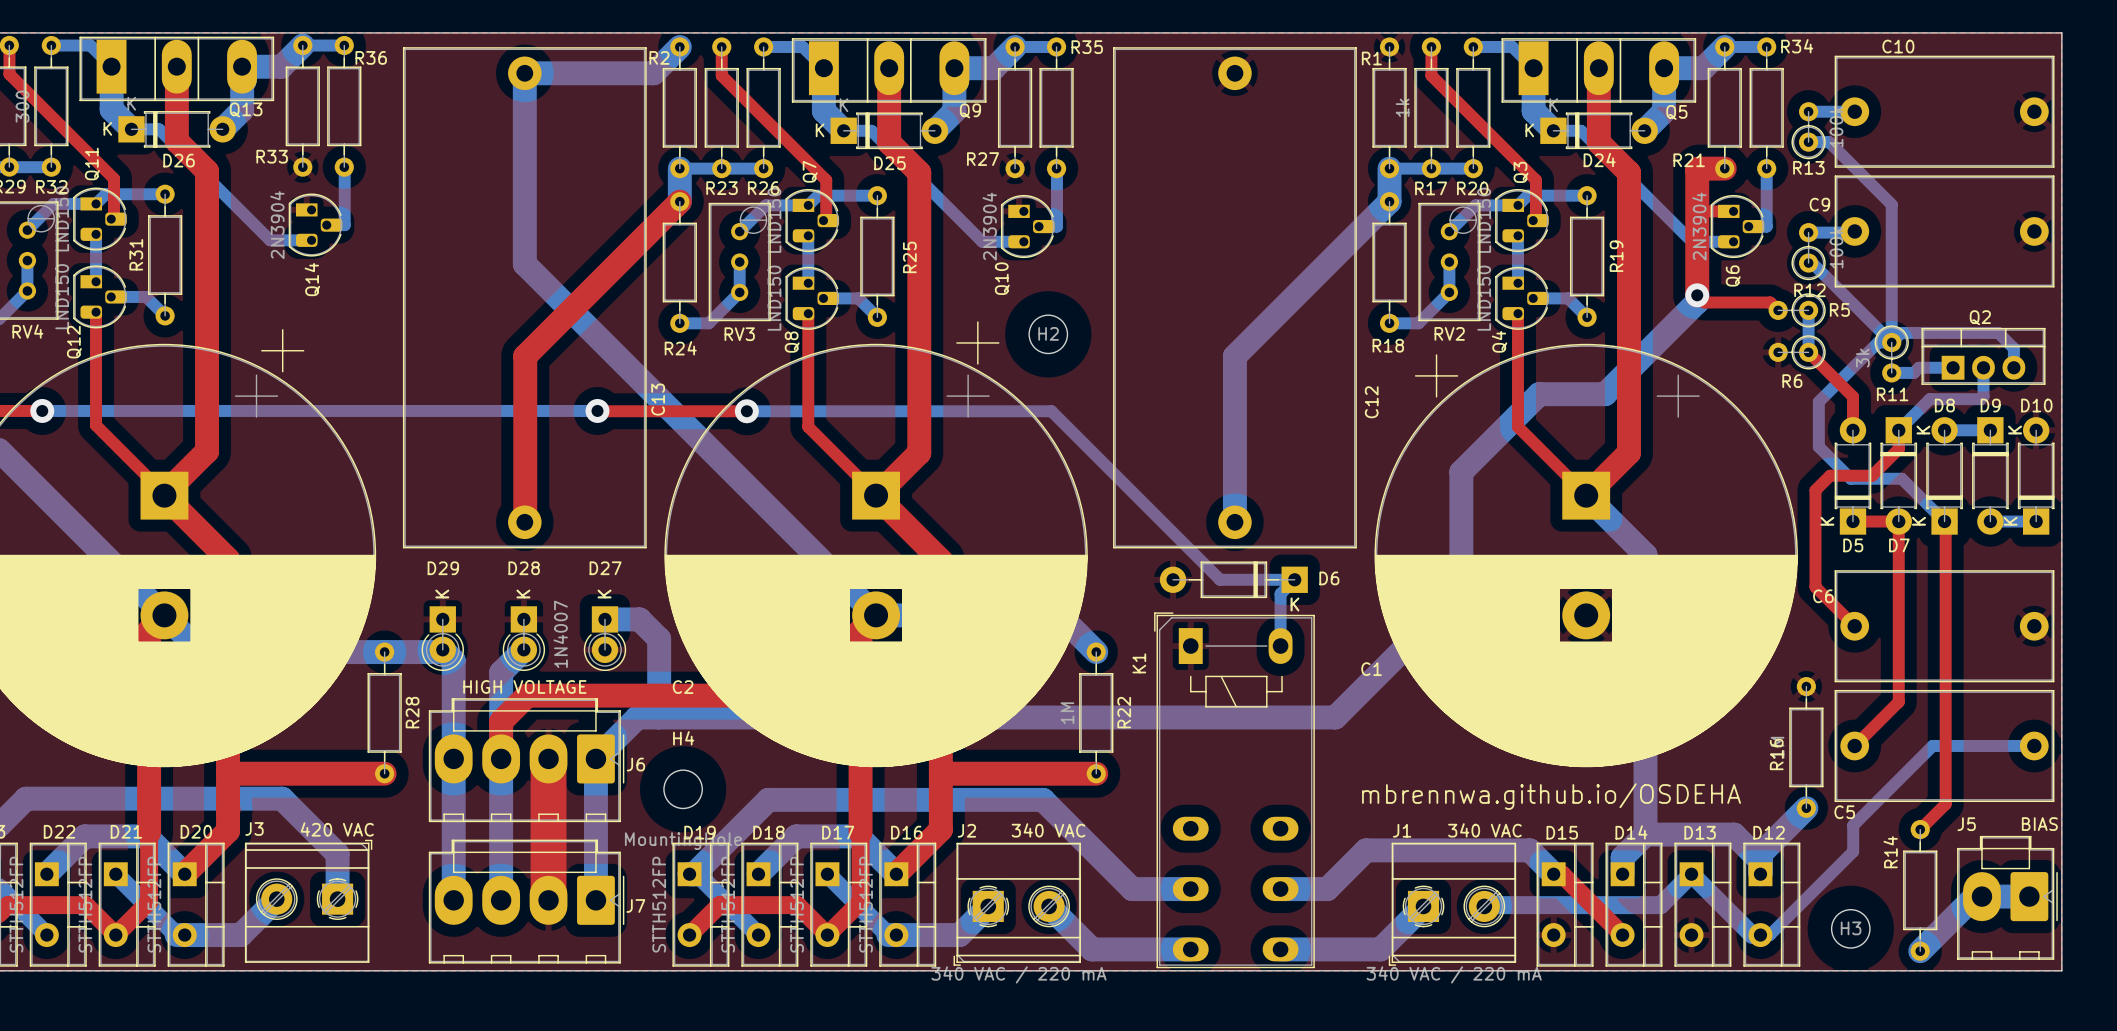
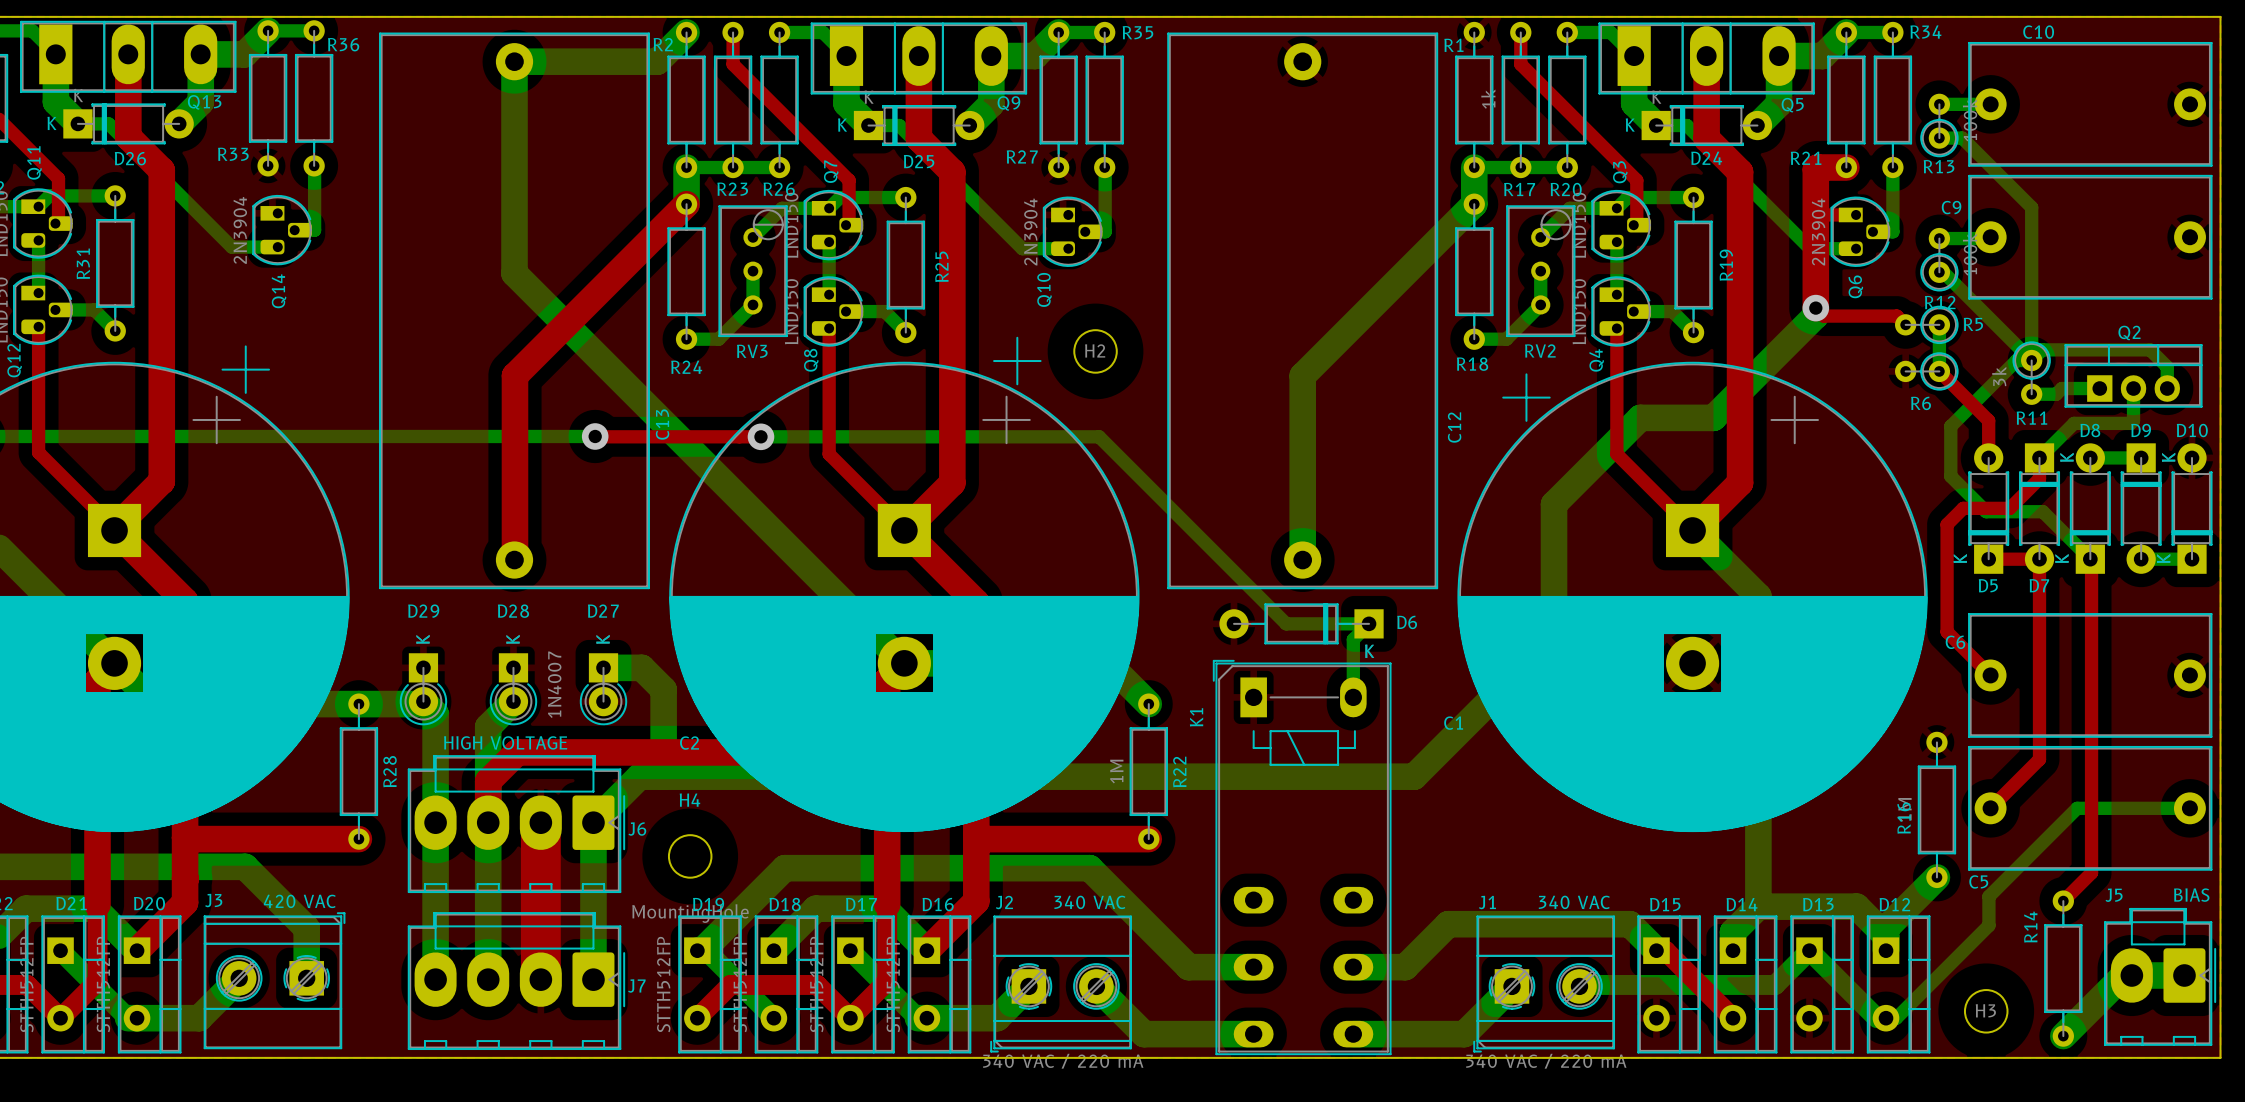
text: mbrennwa.github.io/OSDEHA (1551, 796) -> none

